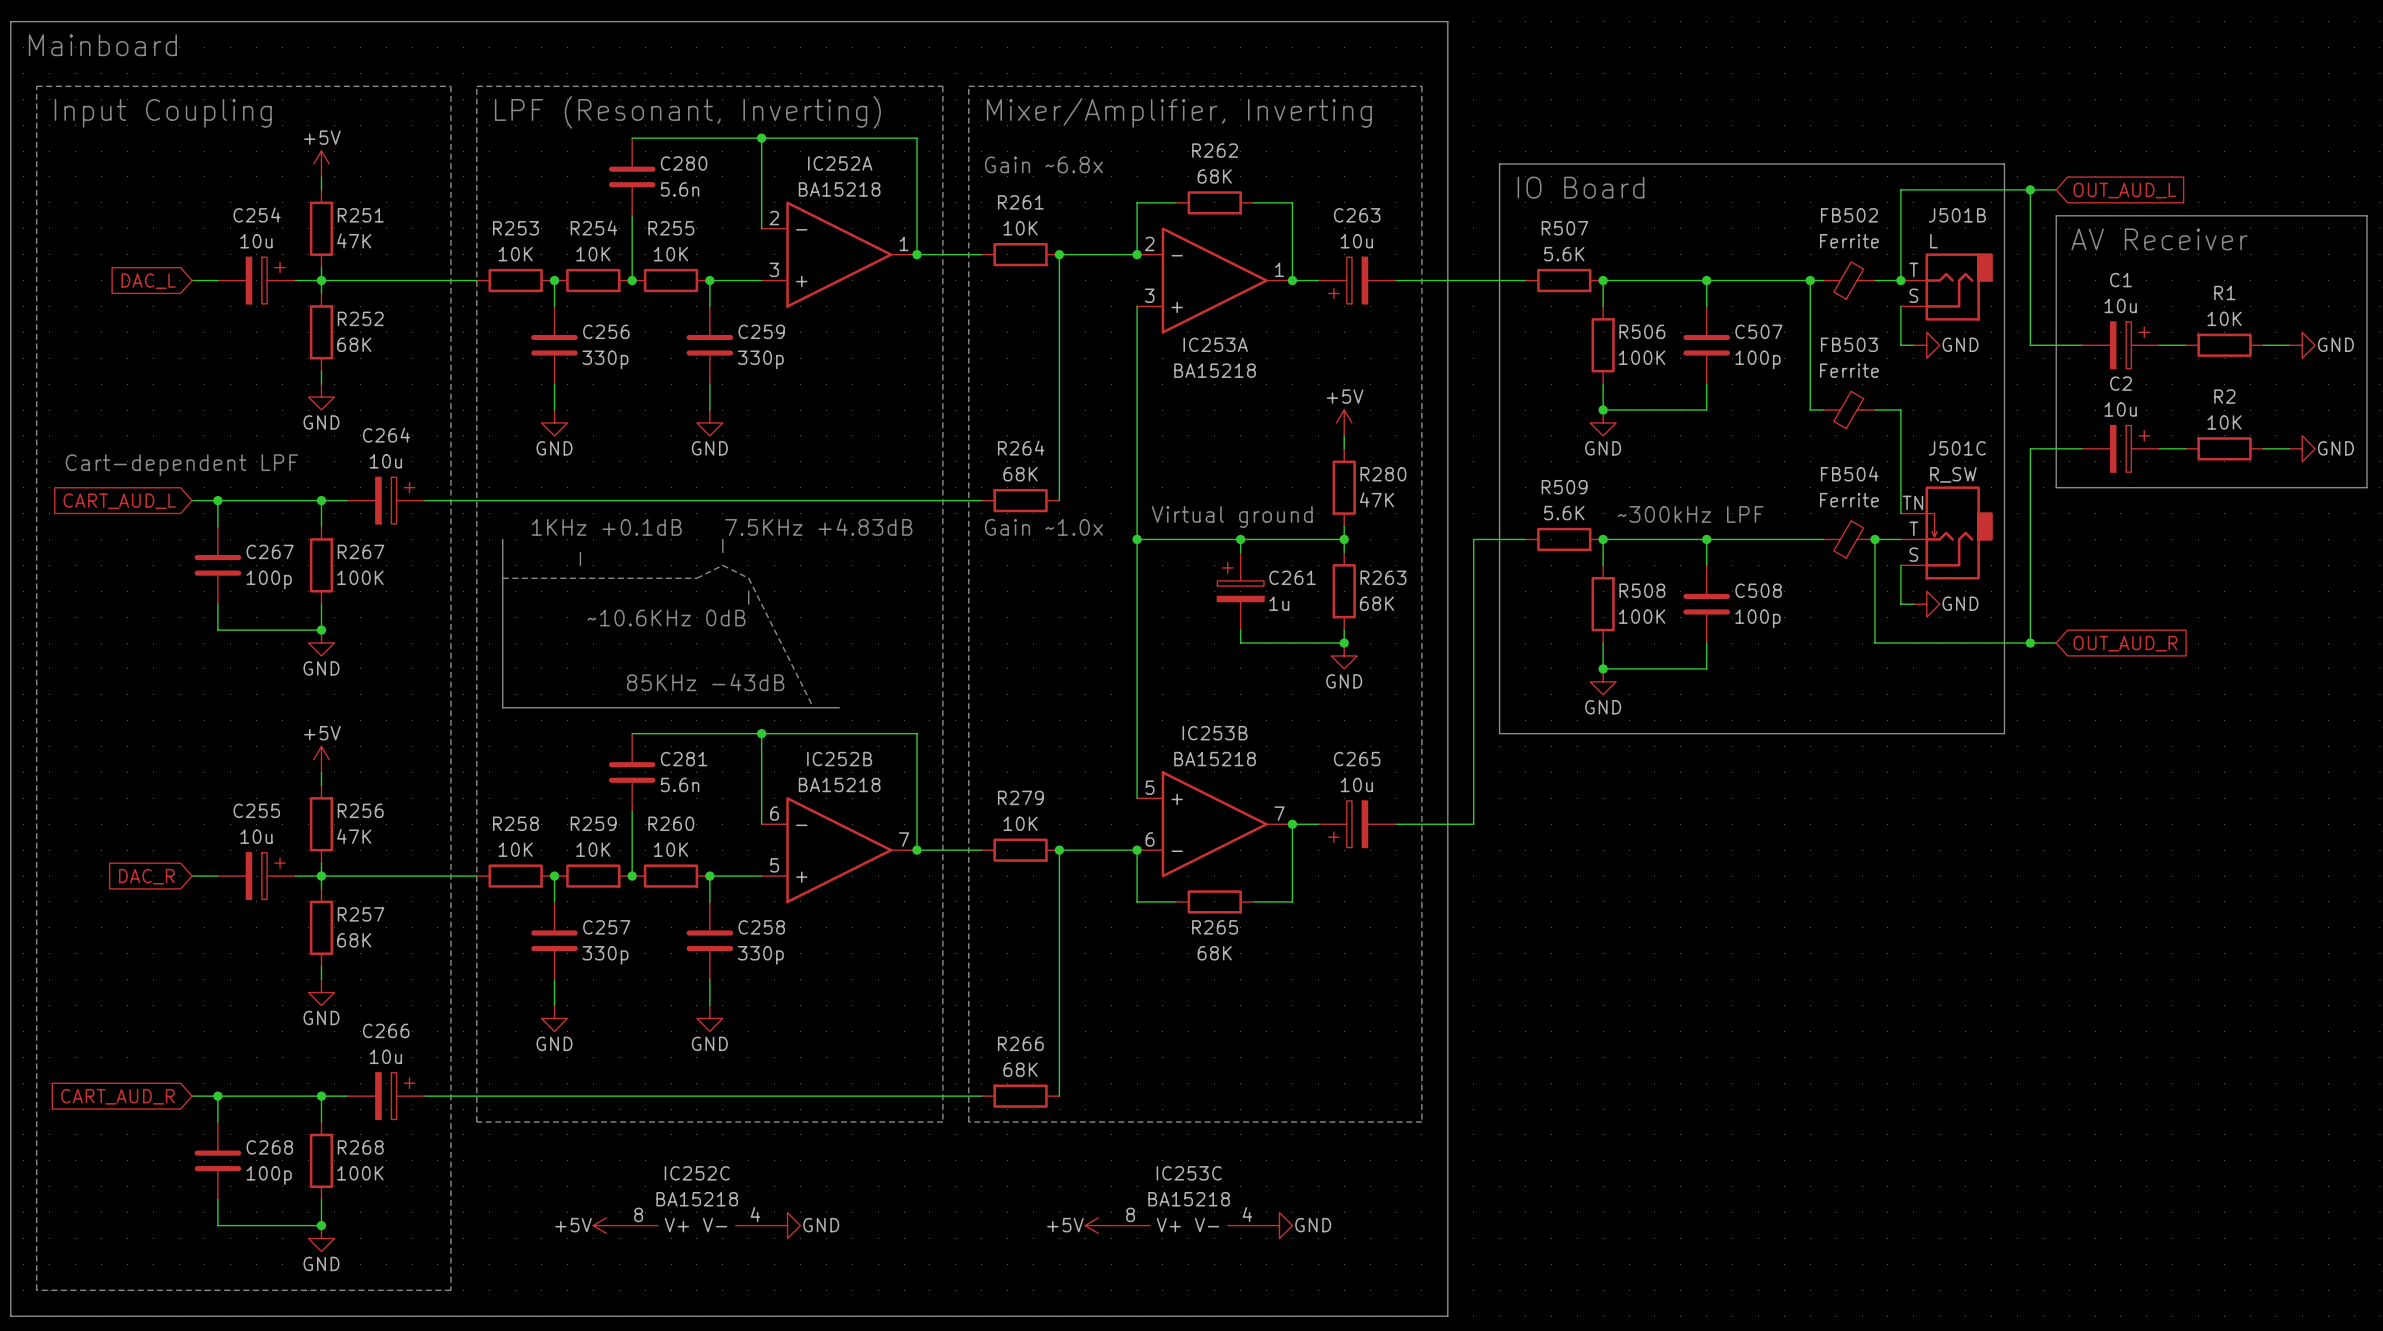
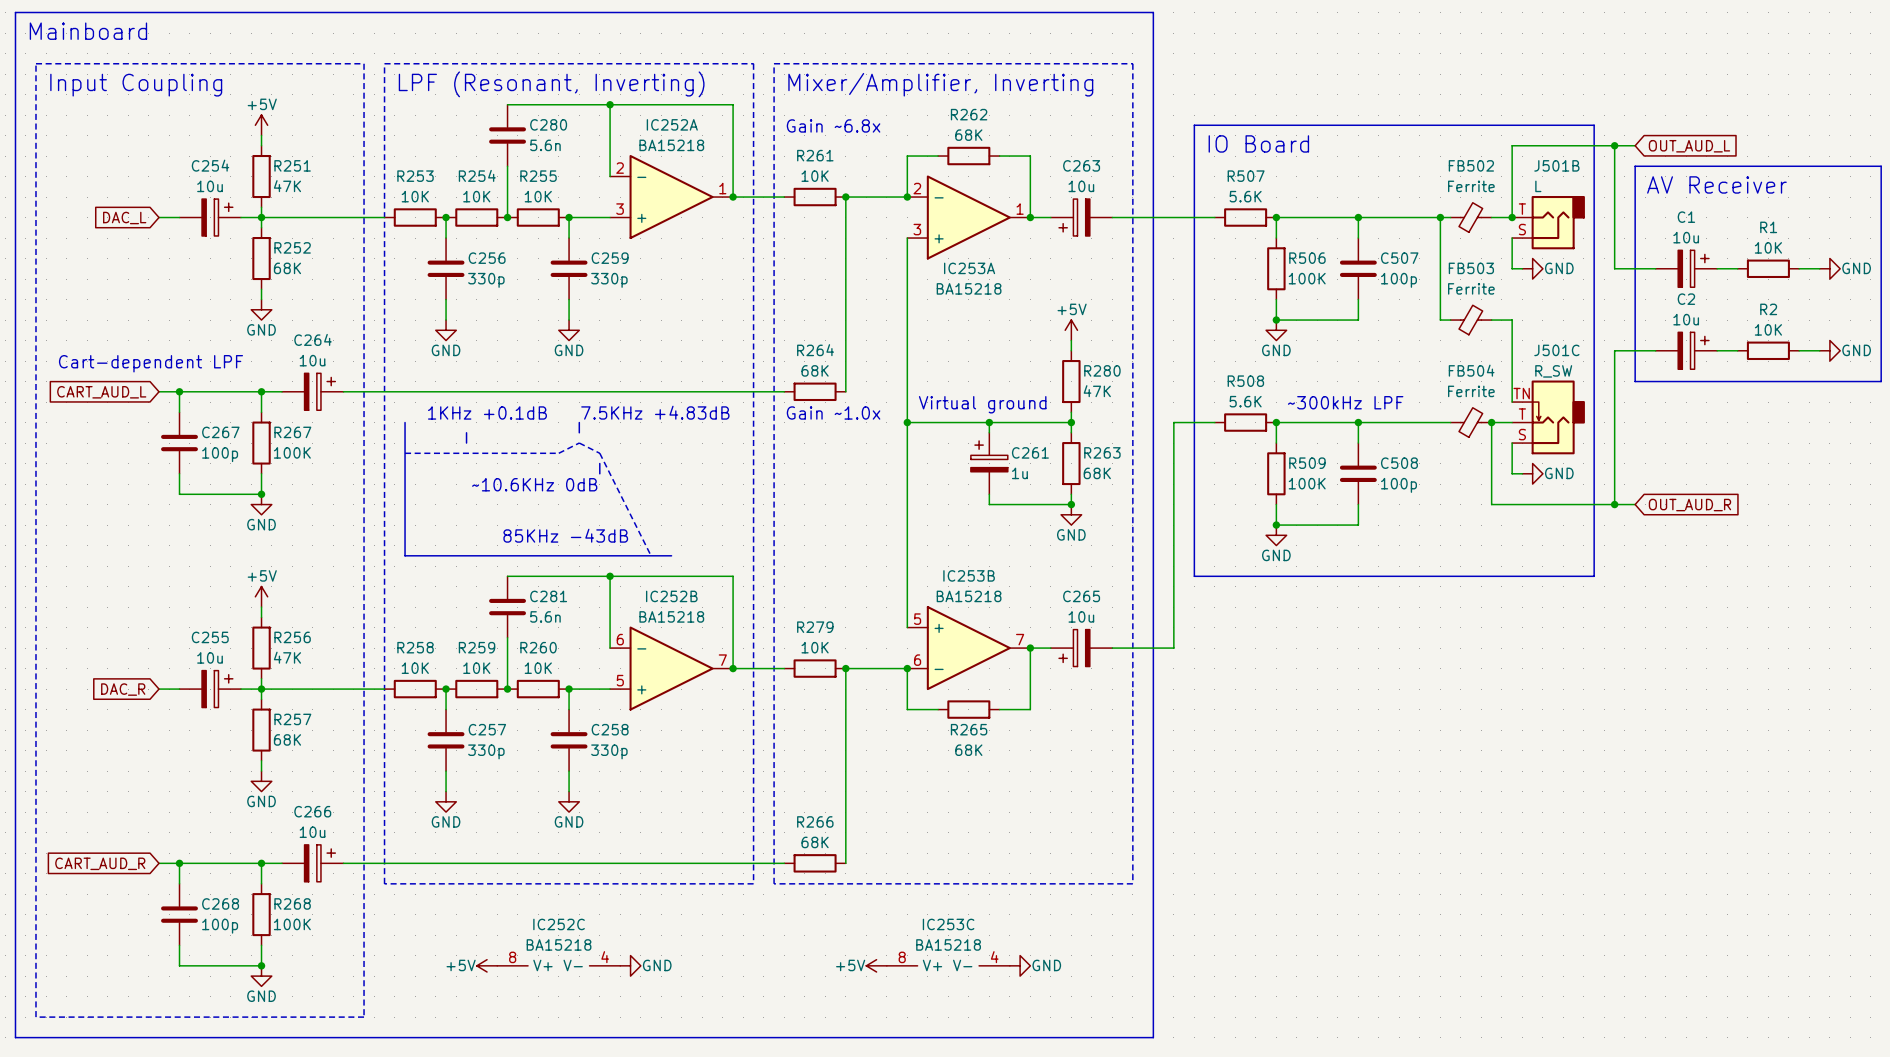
R509 name: R509 (1564, 487) -> R508 (1245, 381)
R508 name: R508 (1642, 590) -> R509 (1307, 463)

